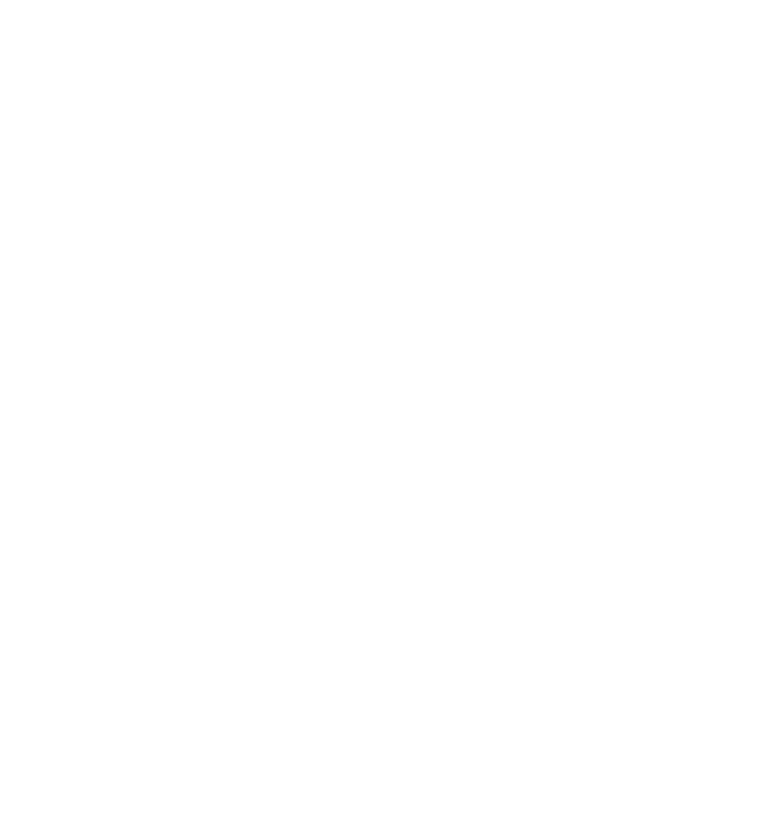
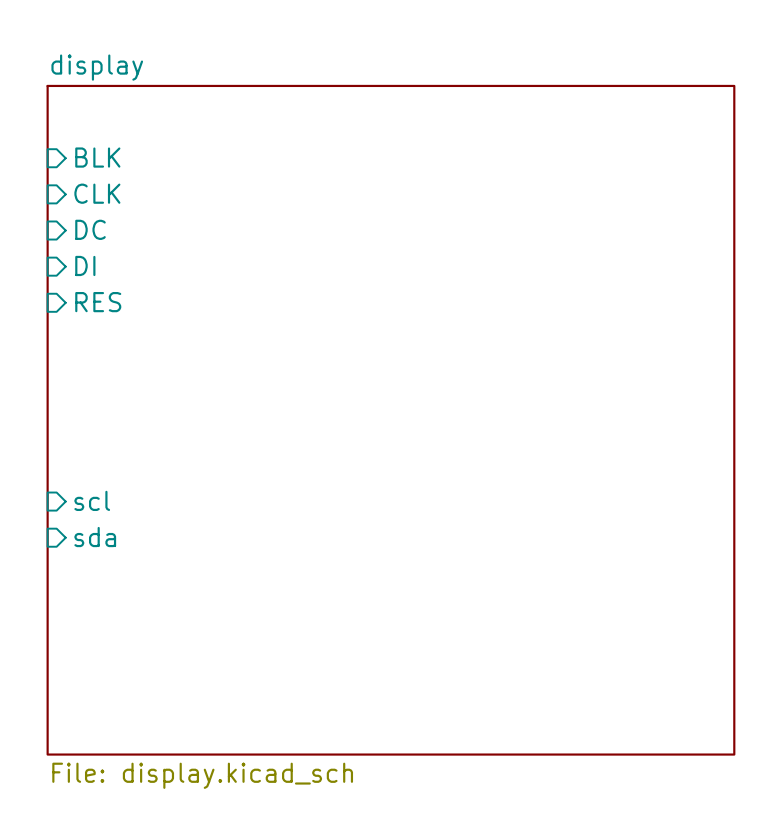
sheet pin: none -> BLK (97, 157)
sheet pin: none -> CLK (97, 193)
sheet pin: none -> DC (90, 229)
sheet pin: none -> DI (85, 265)
sheet pin: none -> RES (98, 302)
sheet display: none -> File: display.kicad_sch (390, 420)
sheet pin: none -> scl (92, 500)
sheet pin: none -> sda (95, 537)

